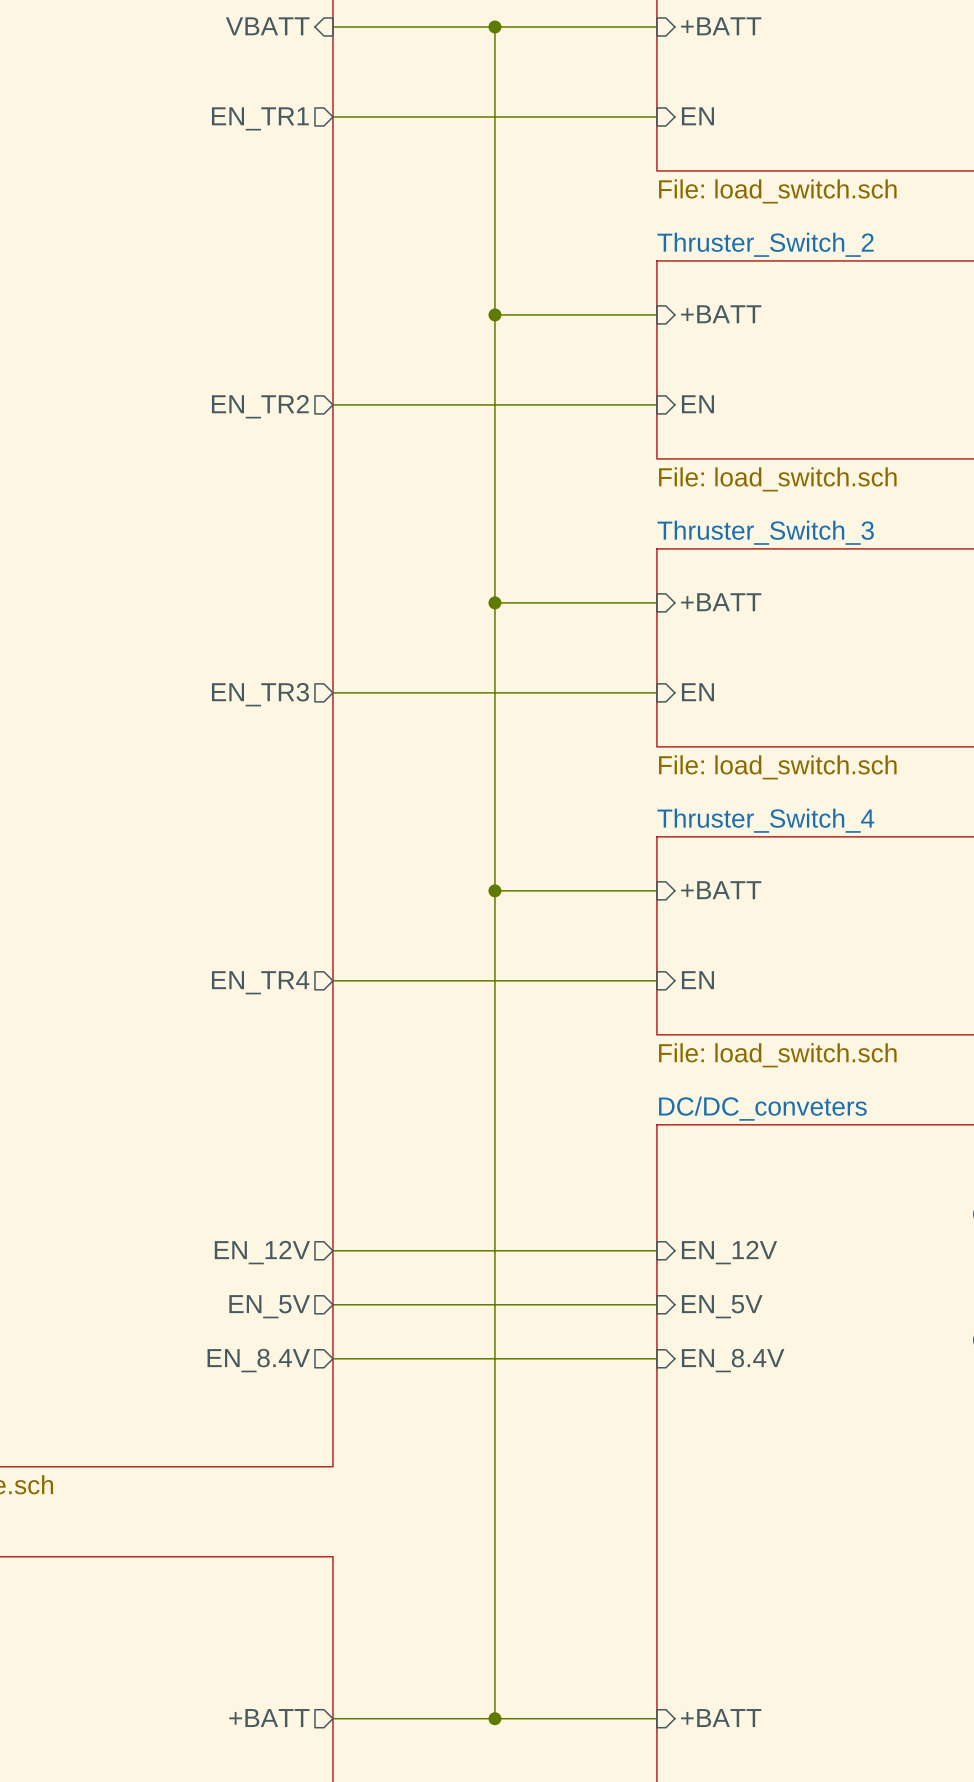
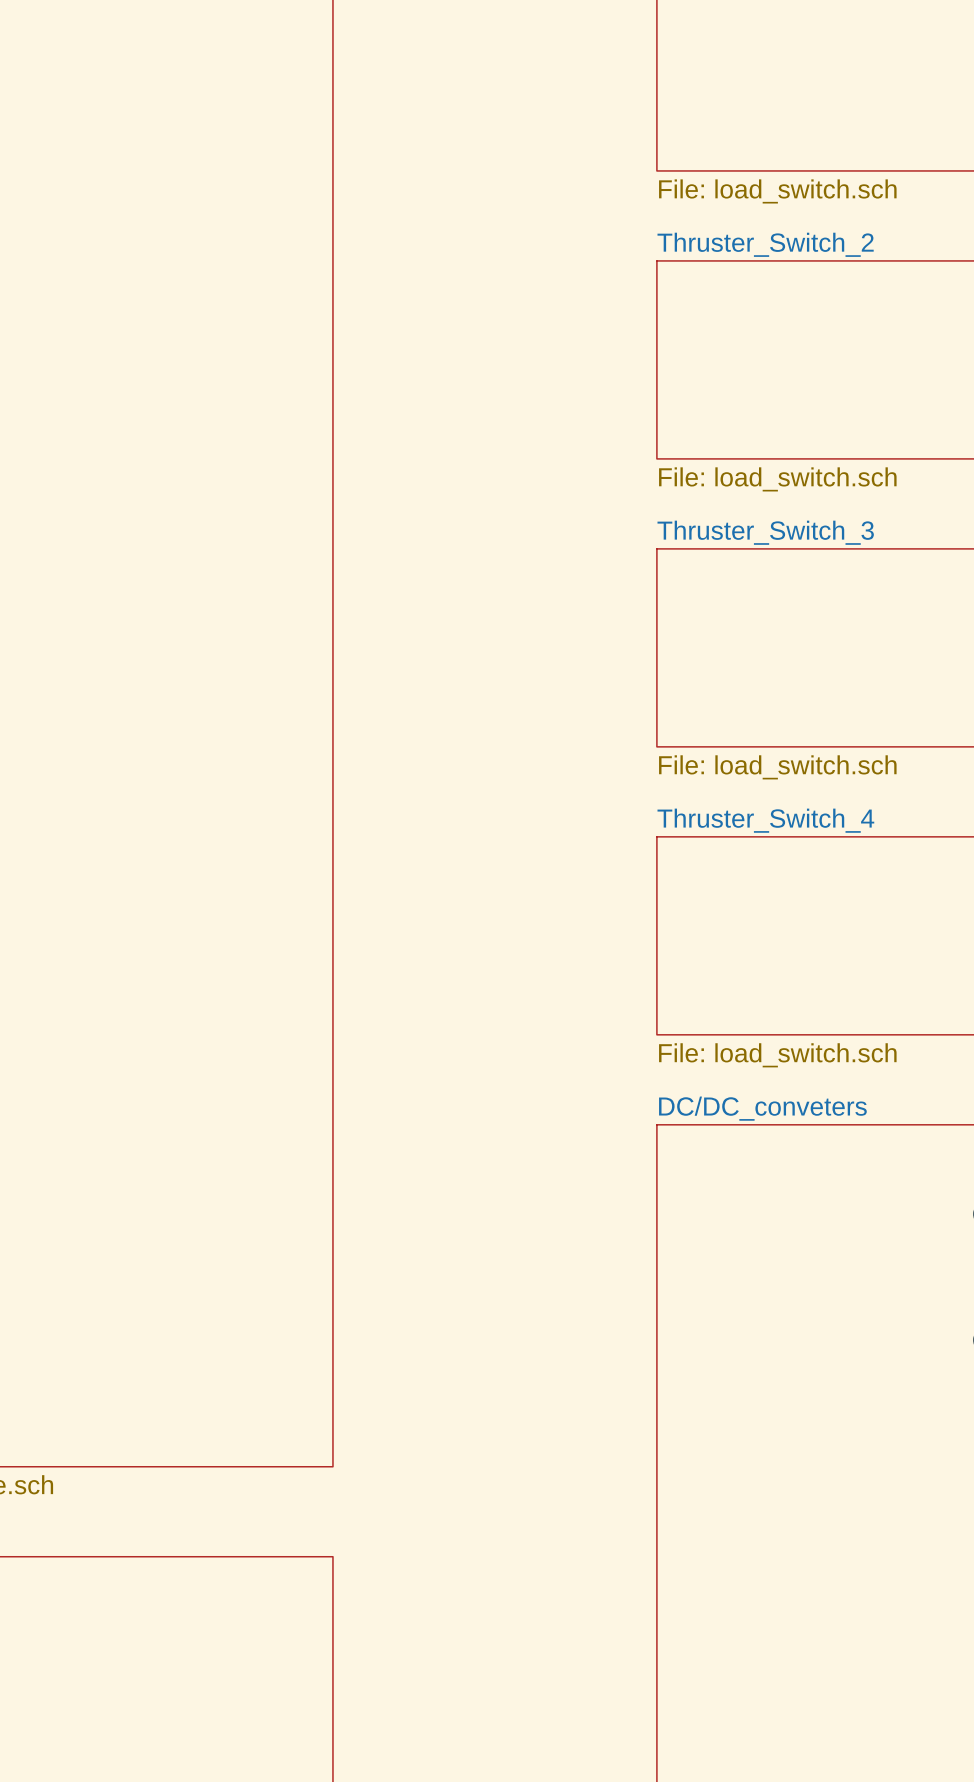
sheet pin: VBATT (267, 26) -> none
wire: (332, 26) (656, 26) -> none
wire: (494, 26) (494, 1718) -> none
junction: (494, 26) -> none
sheet pin: +BATT (721, 26) -> none
wire: (332, 116) (656, 116) -> none
sheet pin: EN (697, 116) -> none
sheet pin: EN_TR1 (260, 118) -> none
wire: (494, 314) (656, 314) -> none
junction: (494, 314) -> none
sheet pin: +BATT (721, 314) -> none
wire: (332, 404) (656, 404) -> none
sheet pin: EN (697, 404) -> none
sheet pin: EN_TR2 (260, 406) -> none
wire: (494, 602) (656, 602) -> none
junction: (494, 602) -> none
sheet pin: +BATT (721, 602) -> none
wire: (332, 692) (656, 692) -> none
sheet pin: EN (697, 692) -> none
sheet pin: EN_TR3 (260, 694) -> none
wire: (494, 890) (656, 890) -> none
junction: (494, 890) -> none
sheet pin: +BATT (721, 890) -> none
wire: (332, 980) (656, 980) -> none
sheet pin: EN (697, 980) -> none
sheet pin: EN_TR4 (260, 982) -> none
wire: (332, 1250) (656, 1250) -> none
sheet pin: EN_12V (262, 1252) -> none
sheet pin: EN_12V (729, 1252) -> none
wire: (332, 1304) (656, 1304) -> none
sheet pin: EN_5V (269, 1306) -> none
sheet pin: EN_5V (722, 1306) -> none
wire: (332, 1358) (656, 1358) -> none
sheet pin: EN_8.4V (258, 1360) -> none
sheet pin: EN_8.4V (733, 1360) -> none
sheet pin: +BATT (269, 1718) -> none
wire: (332, 1718) (656, 1718) -> none
junction: (494, 1718) -> none
sheet pin: +BATT (721, 1718) -> none

